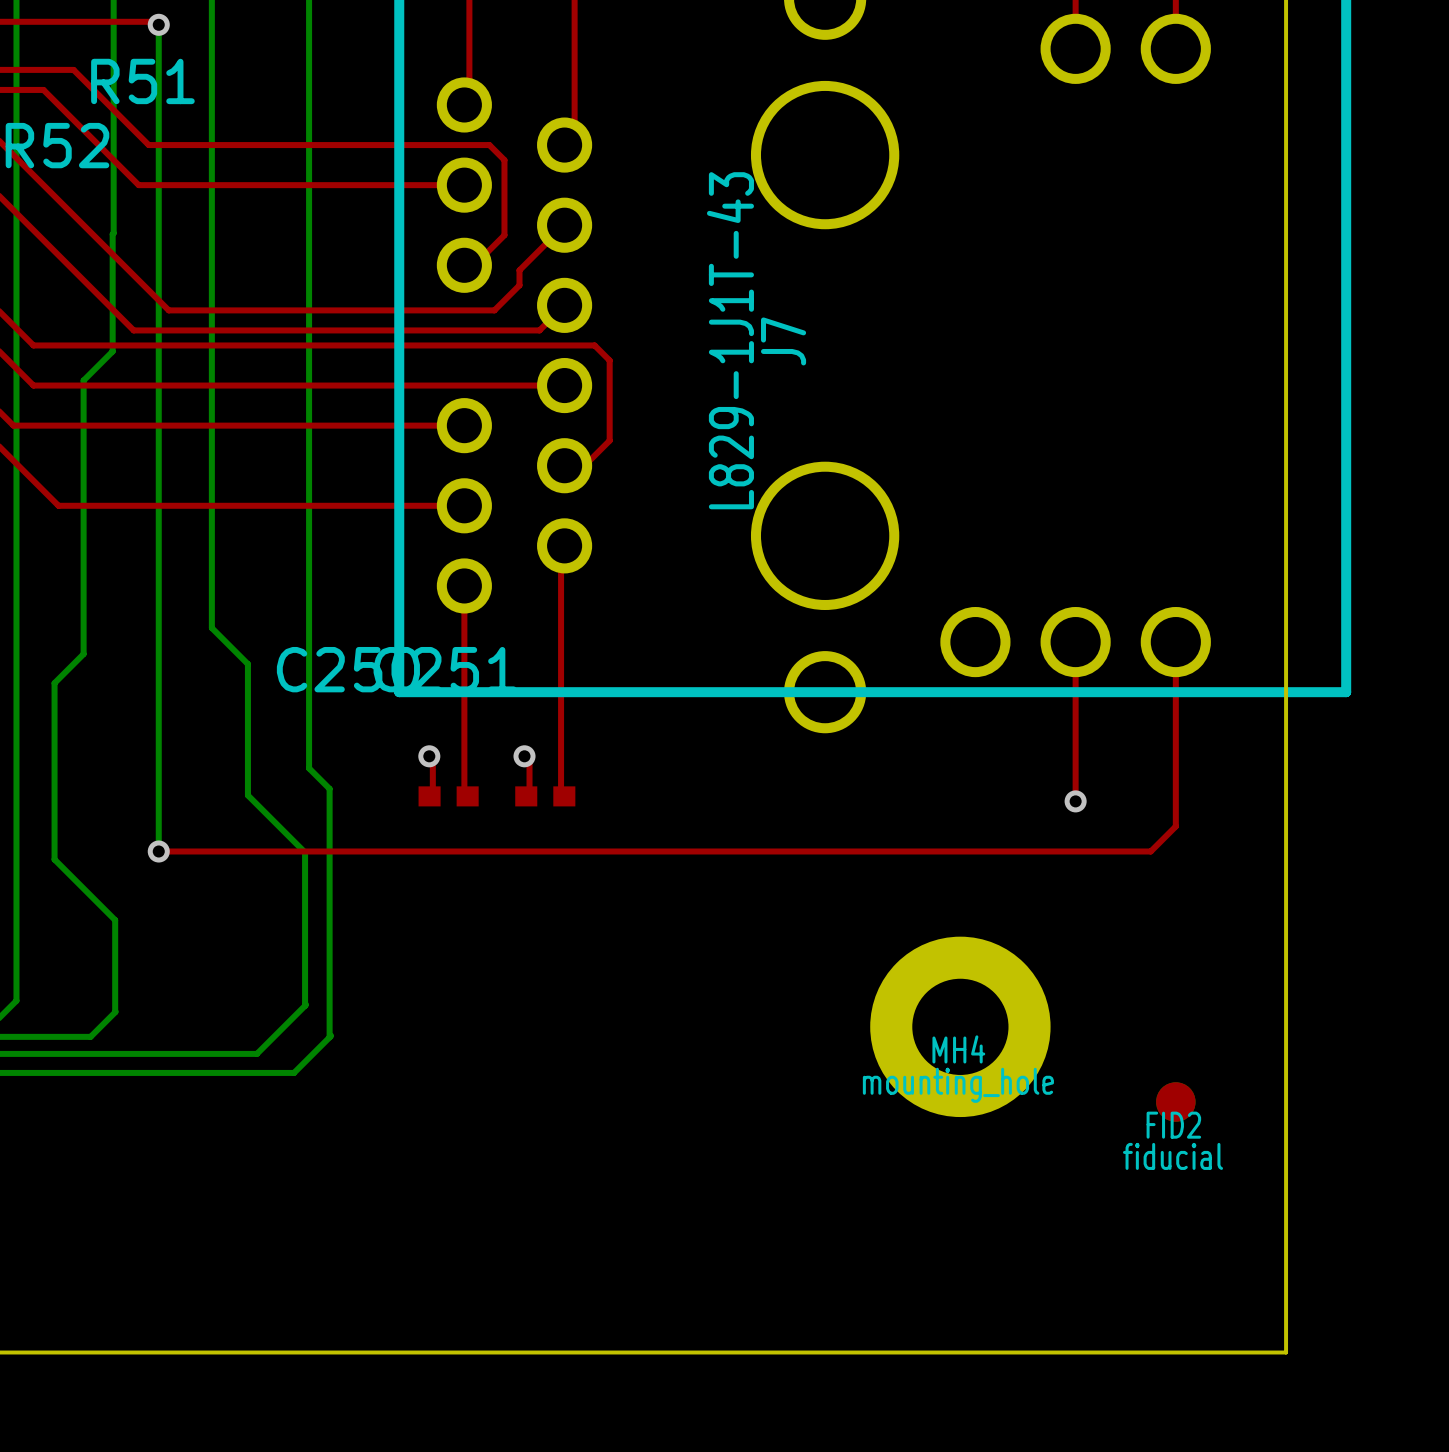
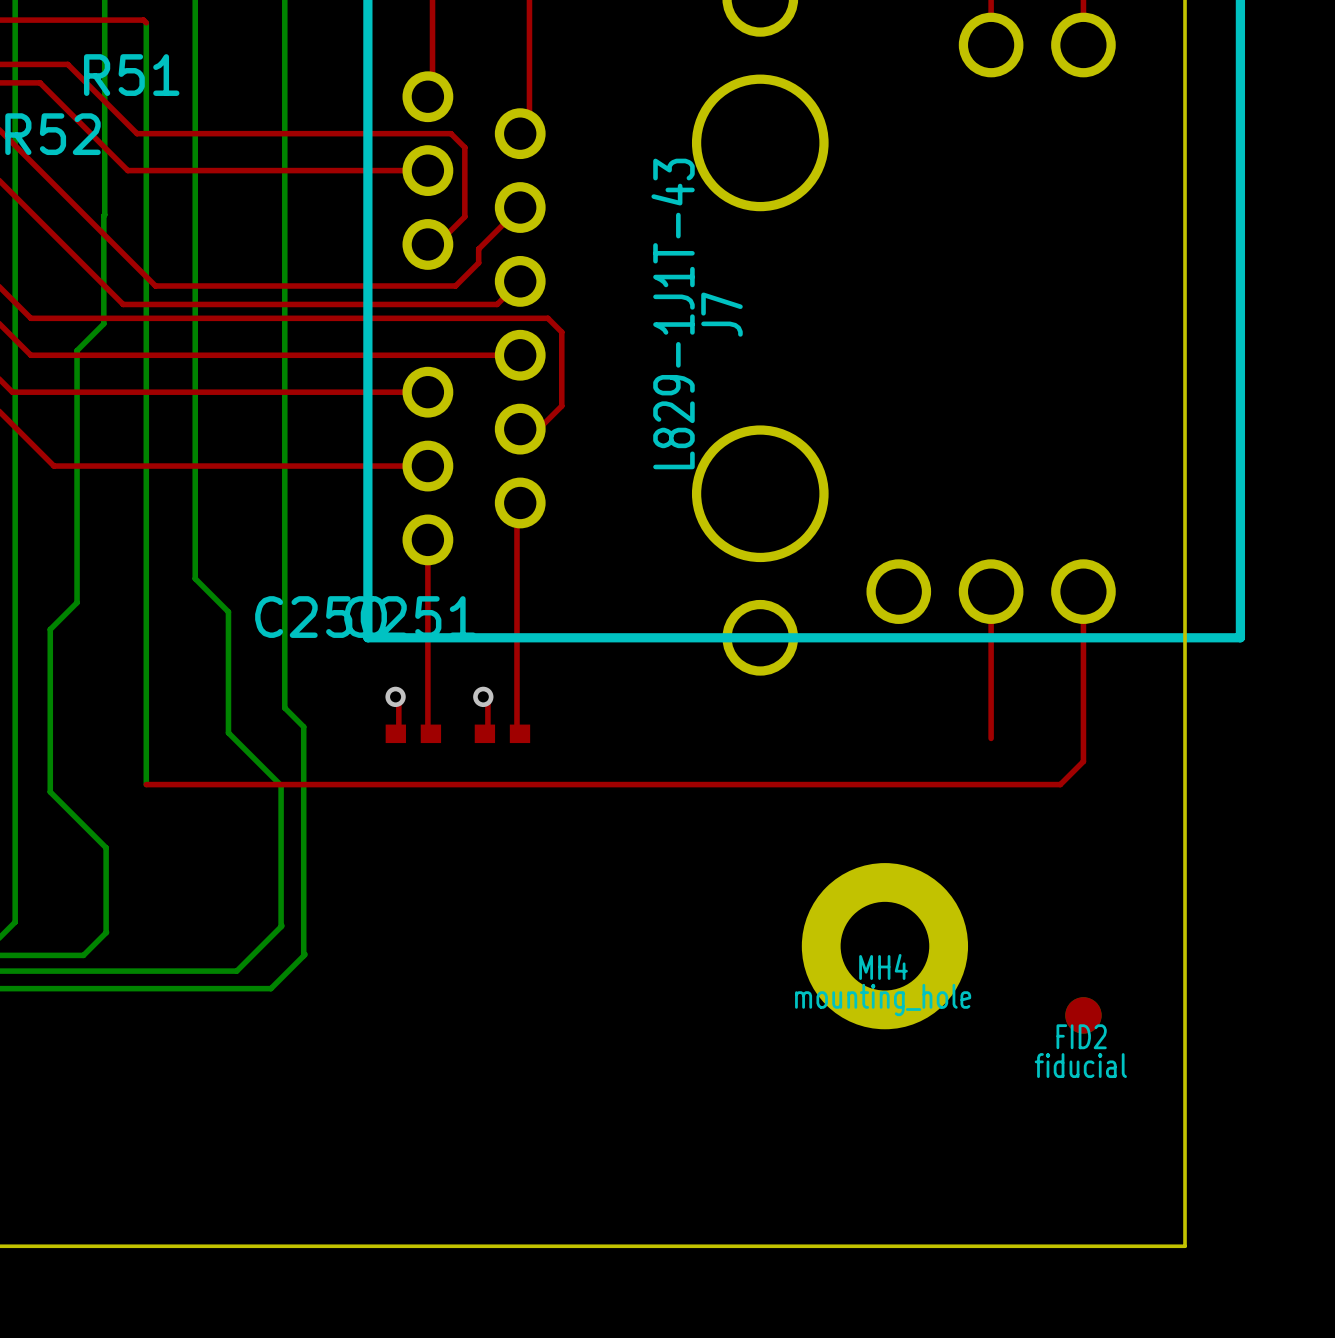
via: (158, 24) -> none
via: (1075, 801) -> none
via: (158, 851) -> none

